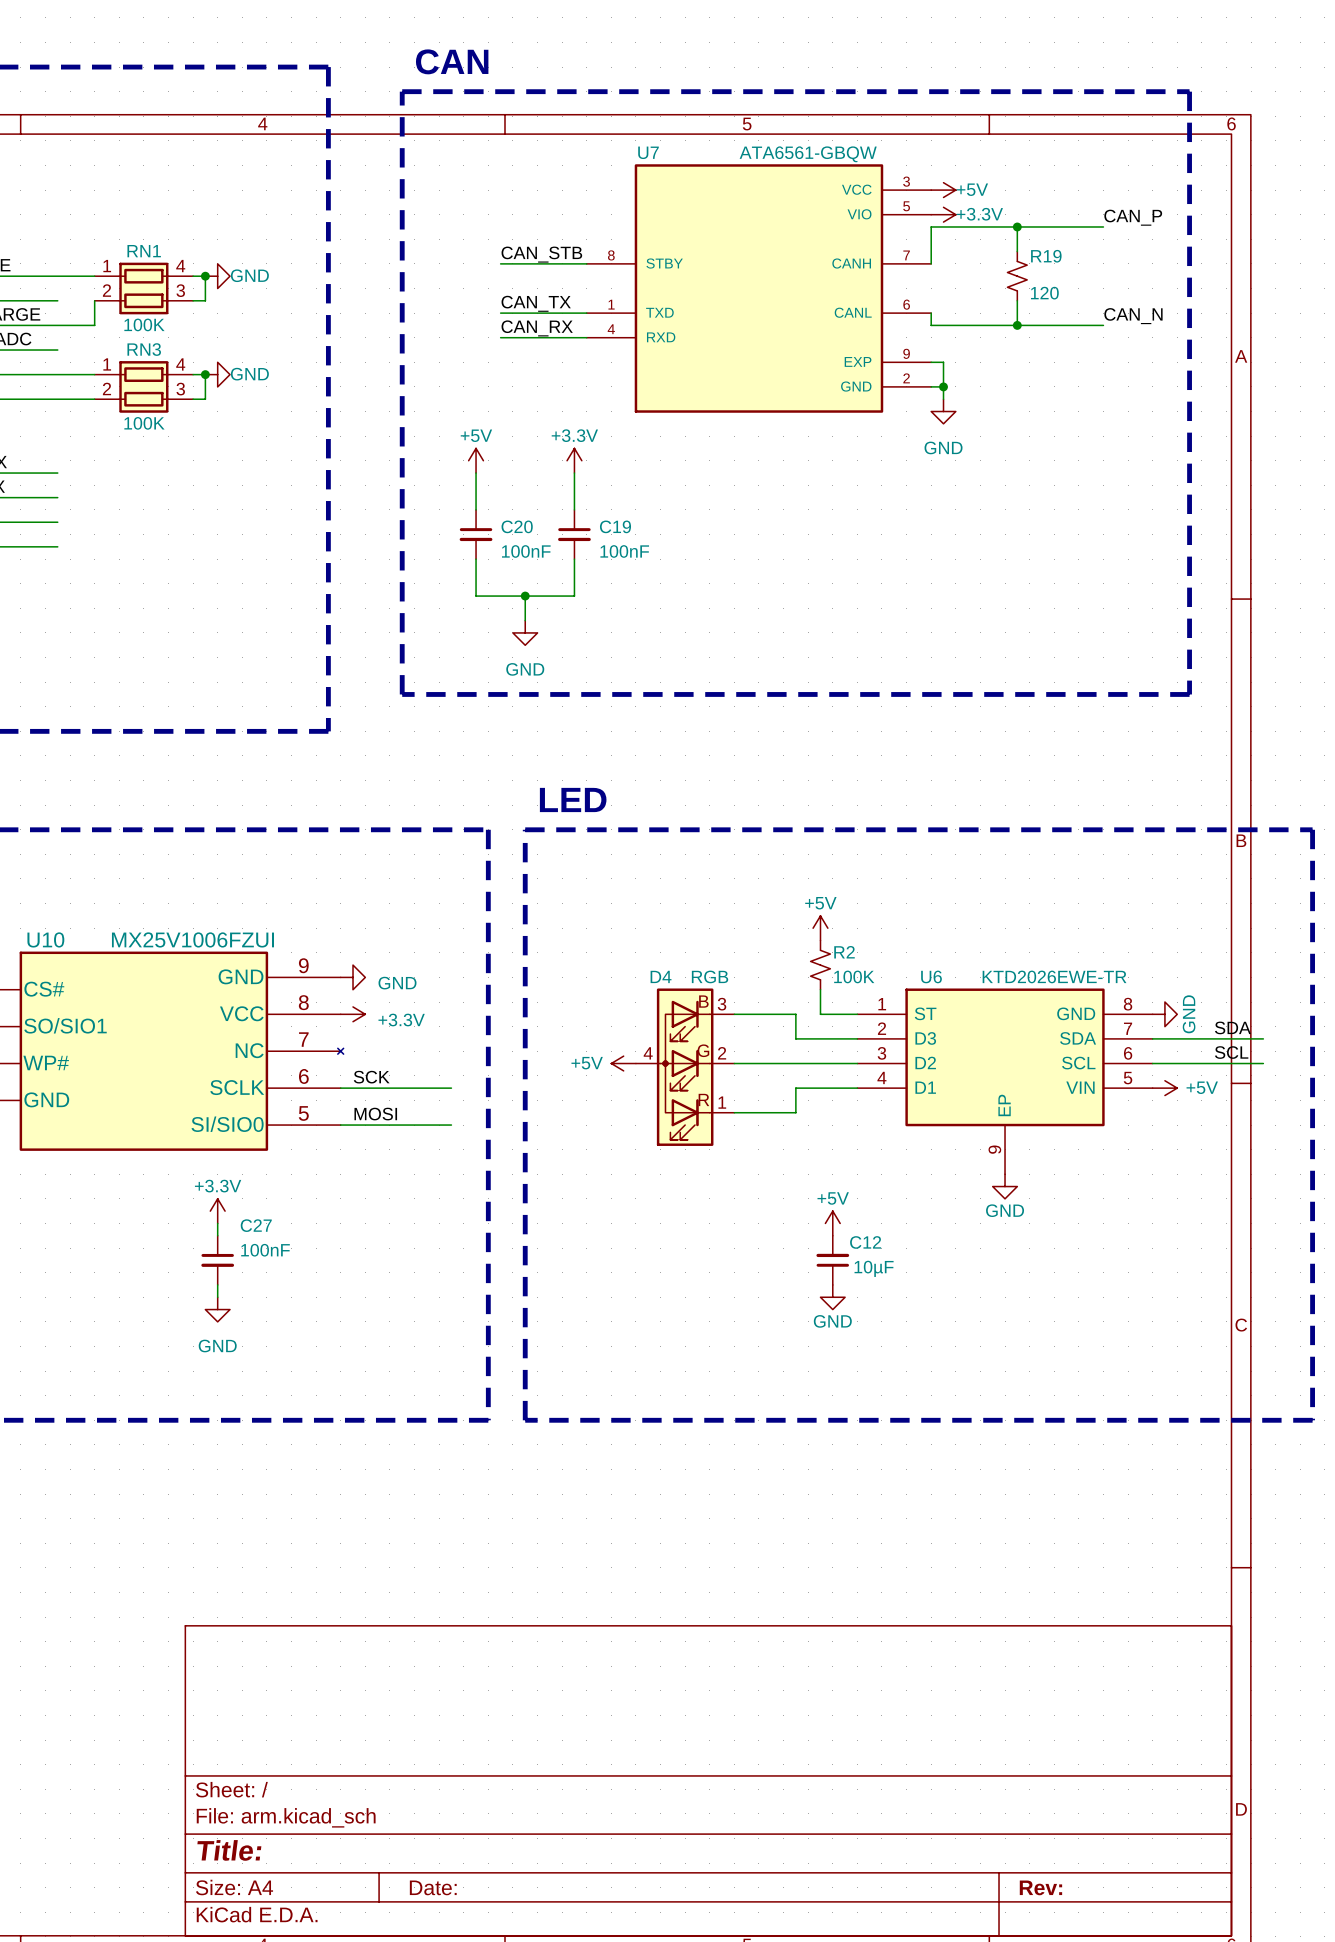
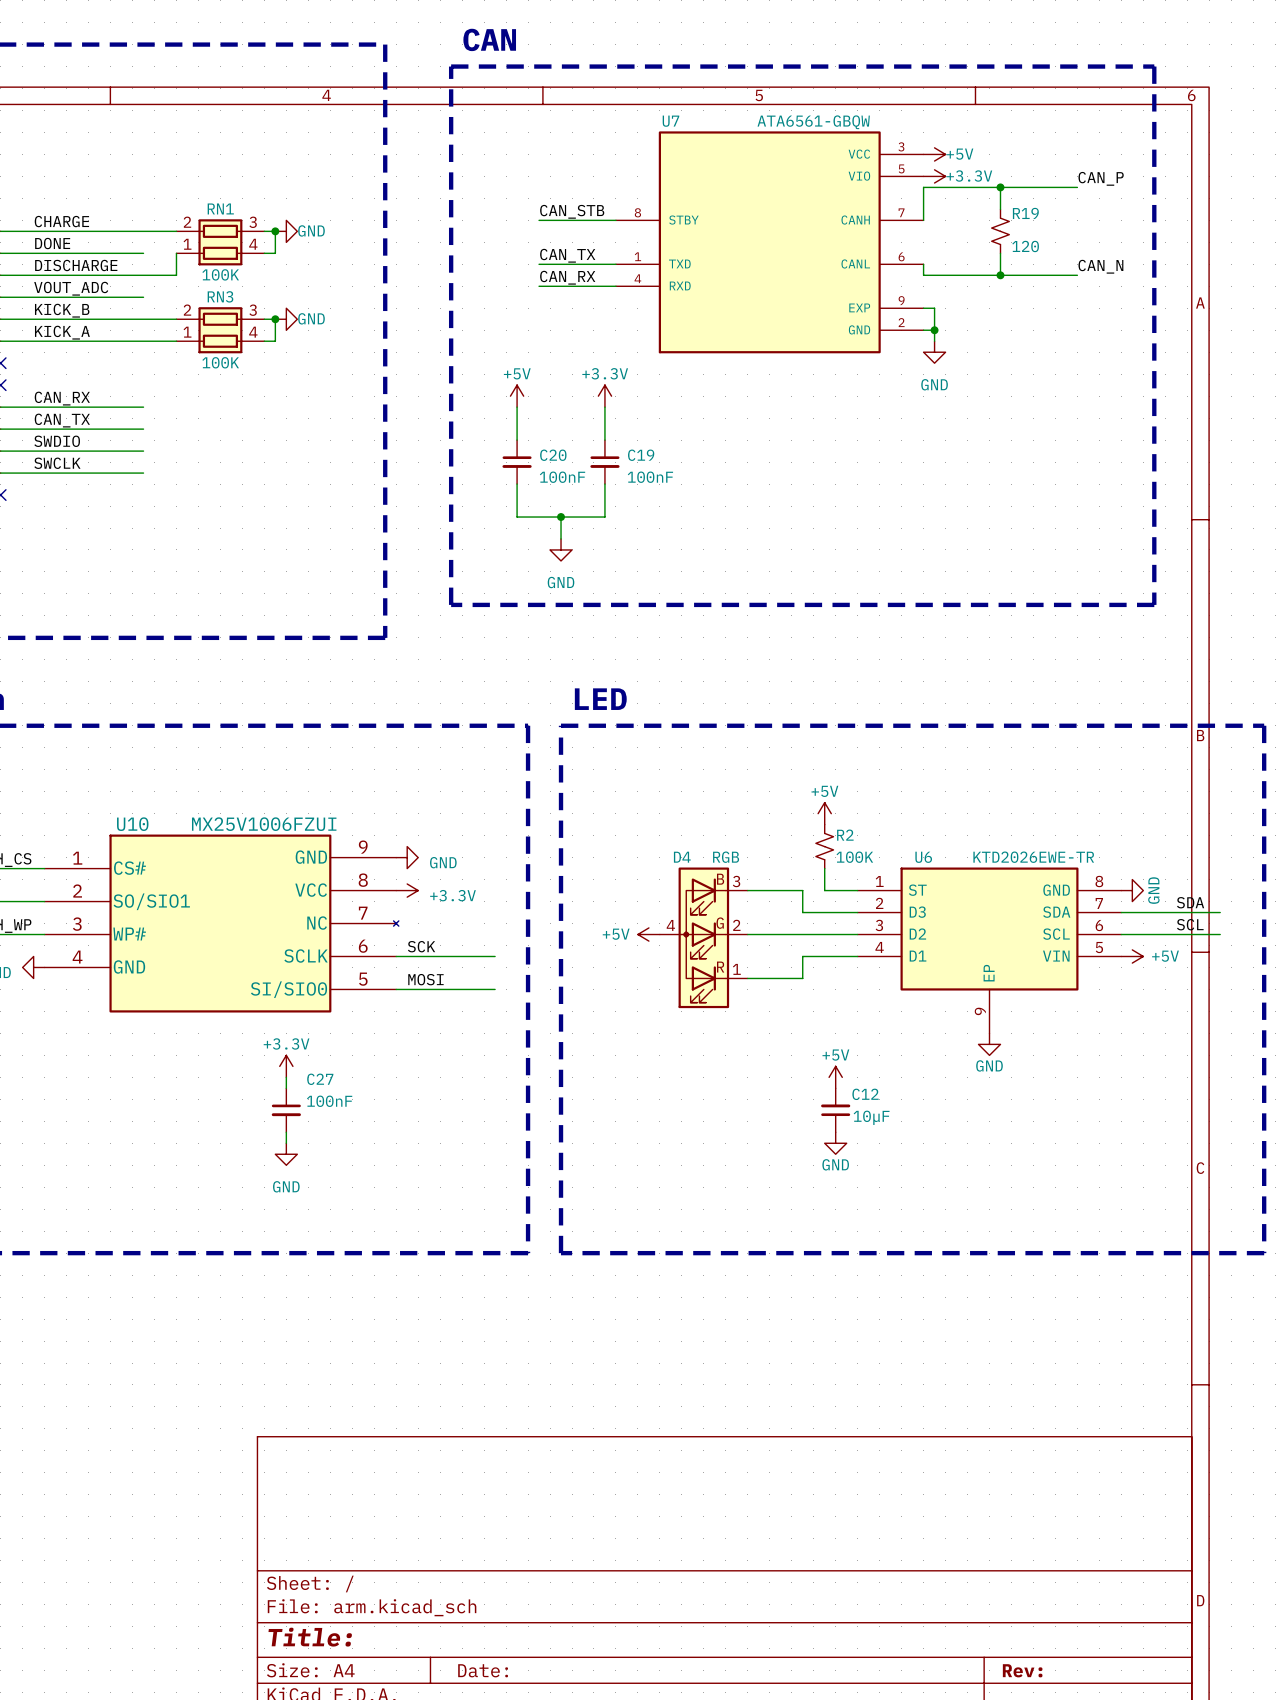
RN1 flip: as is (143, 288) -> up-down (220, 242)
RN3 flip: as is (143, 386) -> up-down (220, 330)

